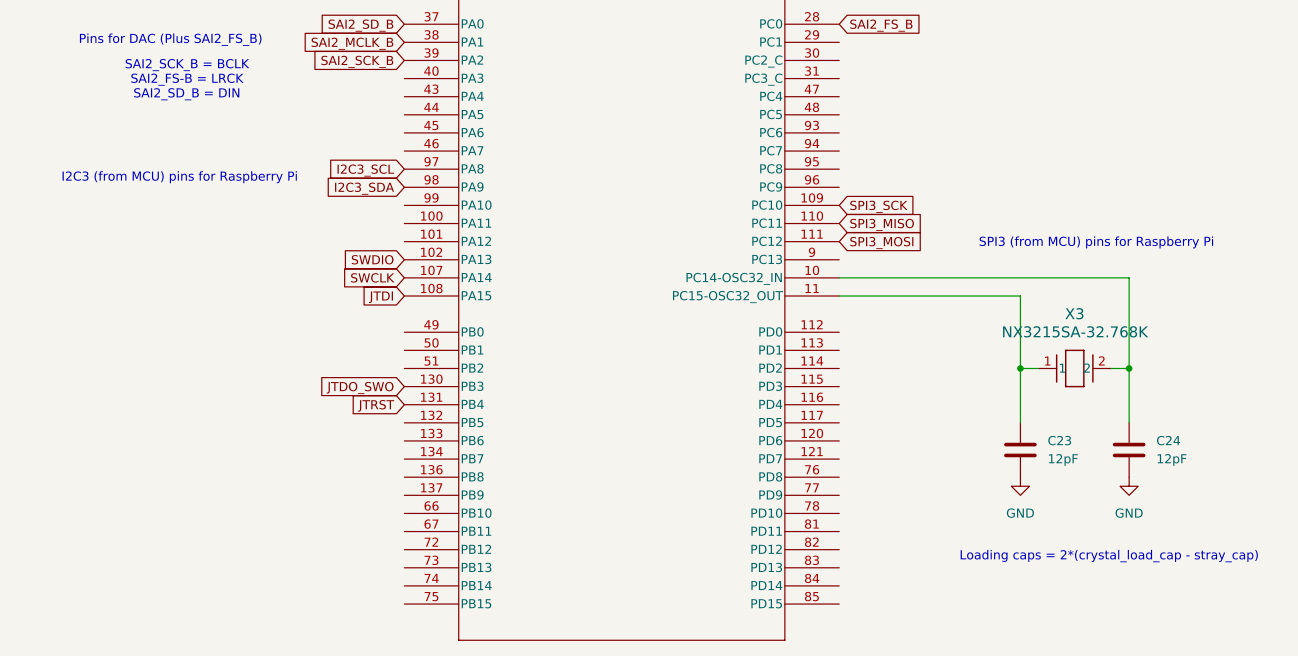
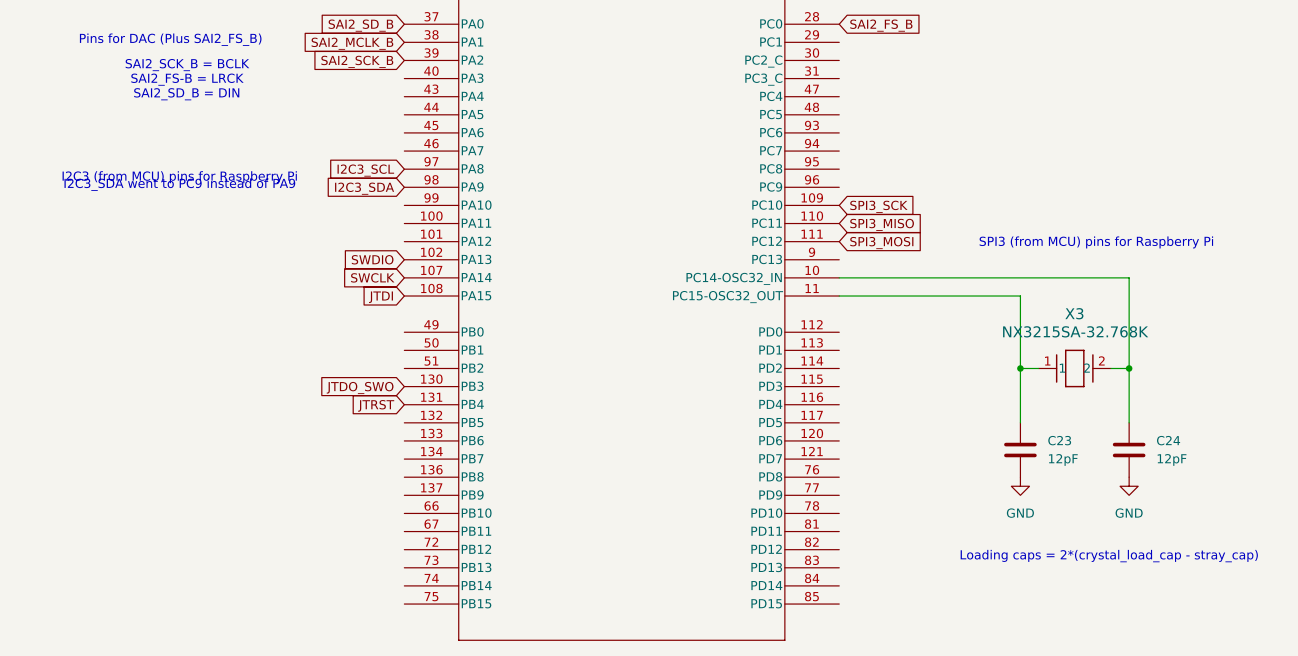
text: none -> I2C3_SDA went to PC9 instead of PA9 (179, 184)

